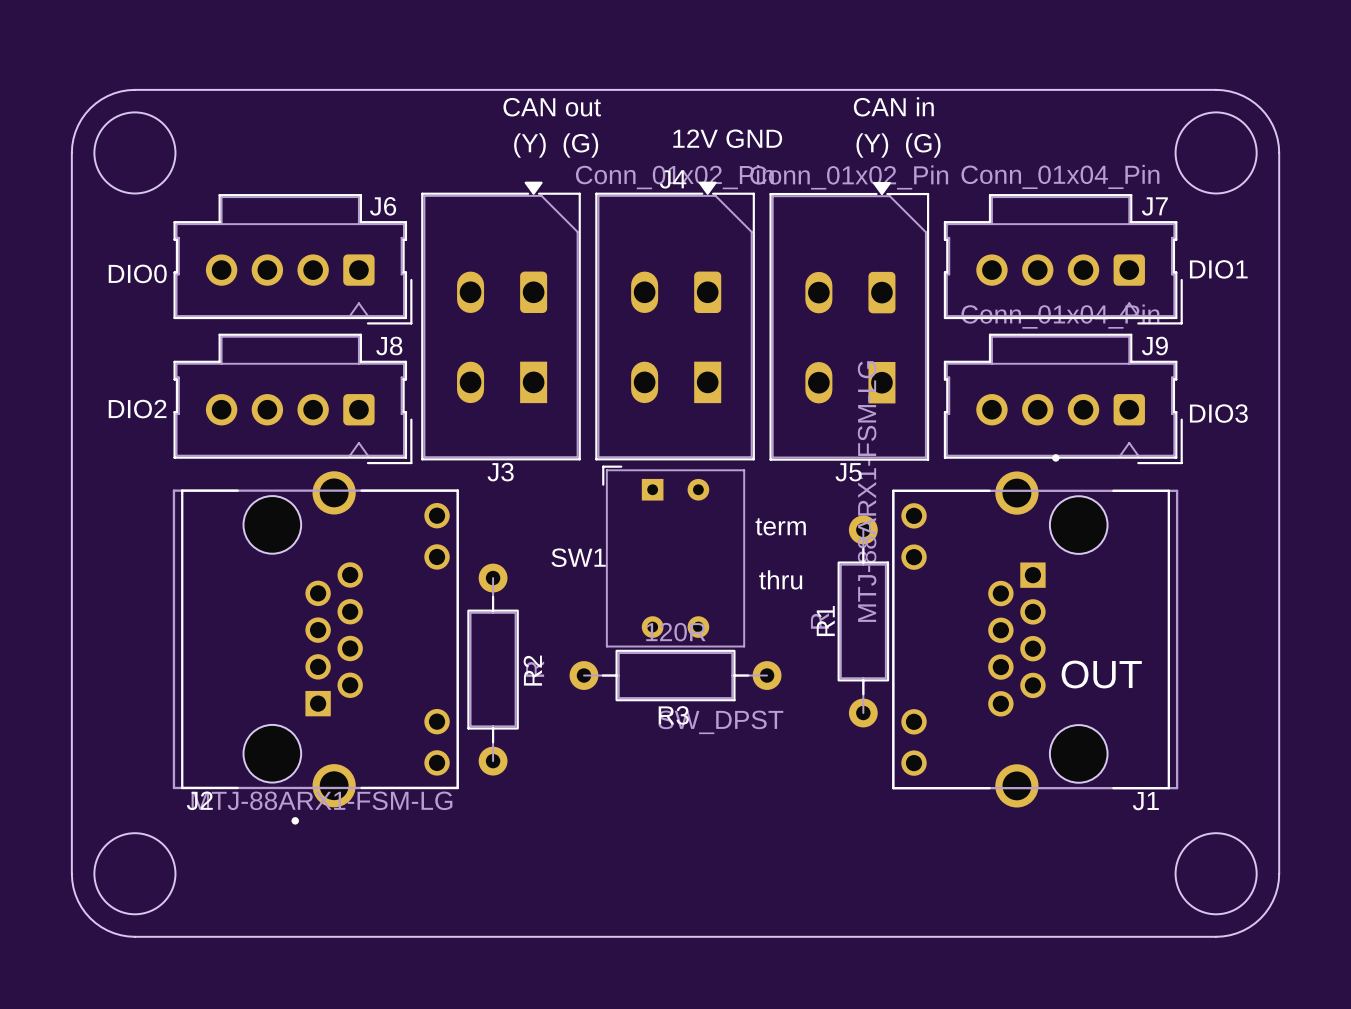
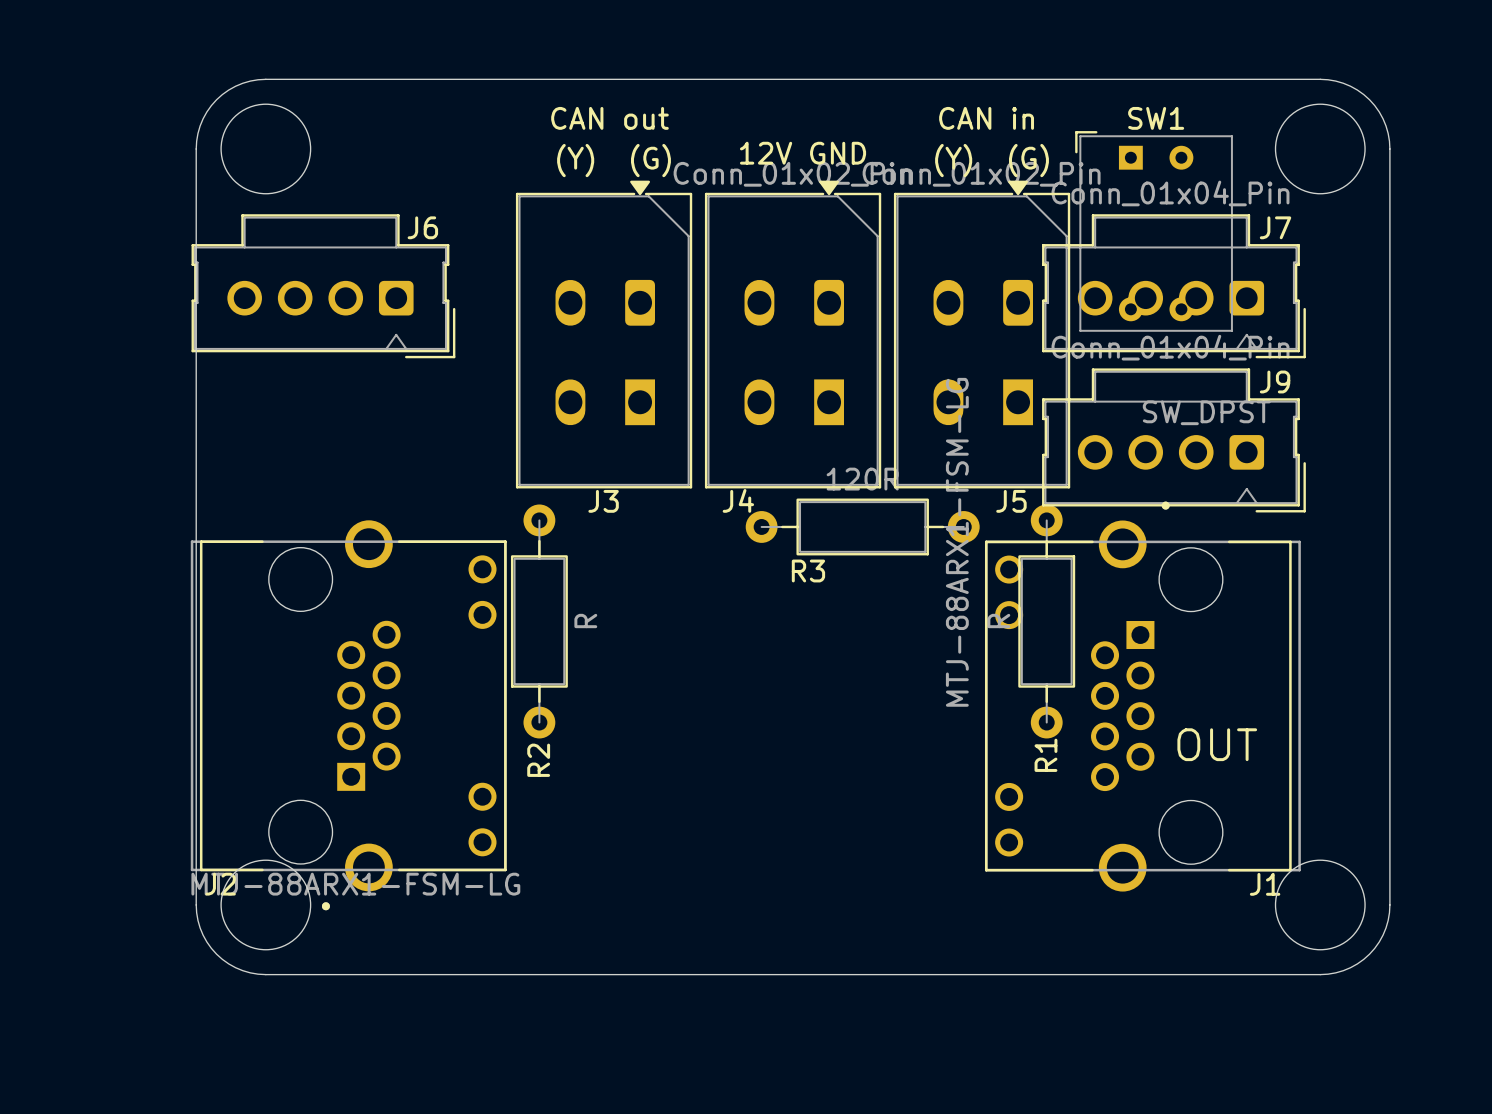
board edge: (134, 89) (1216, 89) (1236, 93) (1255, 103) (1265, 113) (1272, 125) (1277, 138) (1279, 152) (1279, 873) (1275, 894) (1265, 913) (1255, 923) (1243, 930) (1230, 935) (1216, 936) (134, 936) (114, 933) (95, 923) (85, 913) (78, 901) (73, 887) (71, 873) (71, 152) (73, 138) (78, 125) (90, 108) (101, 99) (114, 93) (134, 89) -> (265, 79) (242, 83) (228, 90) (216, 99) (203, 118) (197, 133) (196, 148) (196, 904) (197, 920) (203, 935) (211, 948) (222, 959) (242, 970) (265, 974) (1320, 974) (1335, 972) (1350, 967) (1363, 959) (1374, 948) (1386, 927) (1389, 904) (1389, 148) (1388, 133) (1383, 118) (1374, 105) (1363, 94) (1343, 83) (1320, 79) (265, 79)
round board edge position: (134, 152) -> (265, 148)
round board edge position: (1216, 152) -> (1320, 148)
J4 name position: J4 (673, 179) -> J4 (738, 500)
text: DIO1 (1218, 269) -> none
text: DIO0 (137, 273) -> none
J3 position: (501, 321) -> (604, 334)
J4 position: (675, 321) -> (793, 334)
J5 position: (849, 321) -> (982, 334)
J8: (292, 398) -> none
text: DIO2 (137, 409) -> none
text: DIO3 (1218, 413) -> none
J5 name position: J5 (848, 472) -> J5 (1011, 501)
text: term (780, 526) -> none
SW1 position: (673, 556) -> (1154, 231)
SW1 name position: SW1 (578, 557) -> SW1 (1156, 118)
text: thru (780, 579) -> none
R1 name position: R1 (825, 621) -> R1 (1045, 755)
R1 position: (863, 621) -> (1046, 621)
R2 position: (493, 669) -> (539, 621)
R2 name position: R2 (532, 670) -> R2 (538, 760)
R3 position: (675, 675) -> (862, 526)
R3 name position: R3 (673, 715) -> R3 (808, 570)
round board edge position: (134, 873) -> (265, 904)
round board edge position: (1216, 873) -> (1320, 904)

